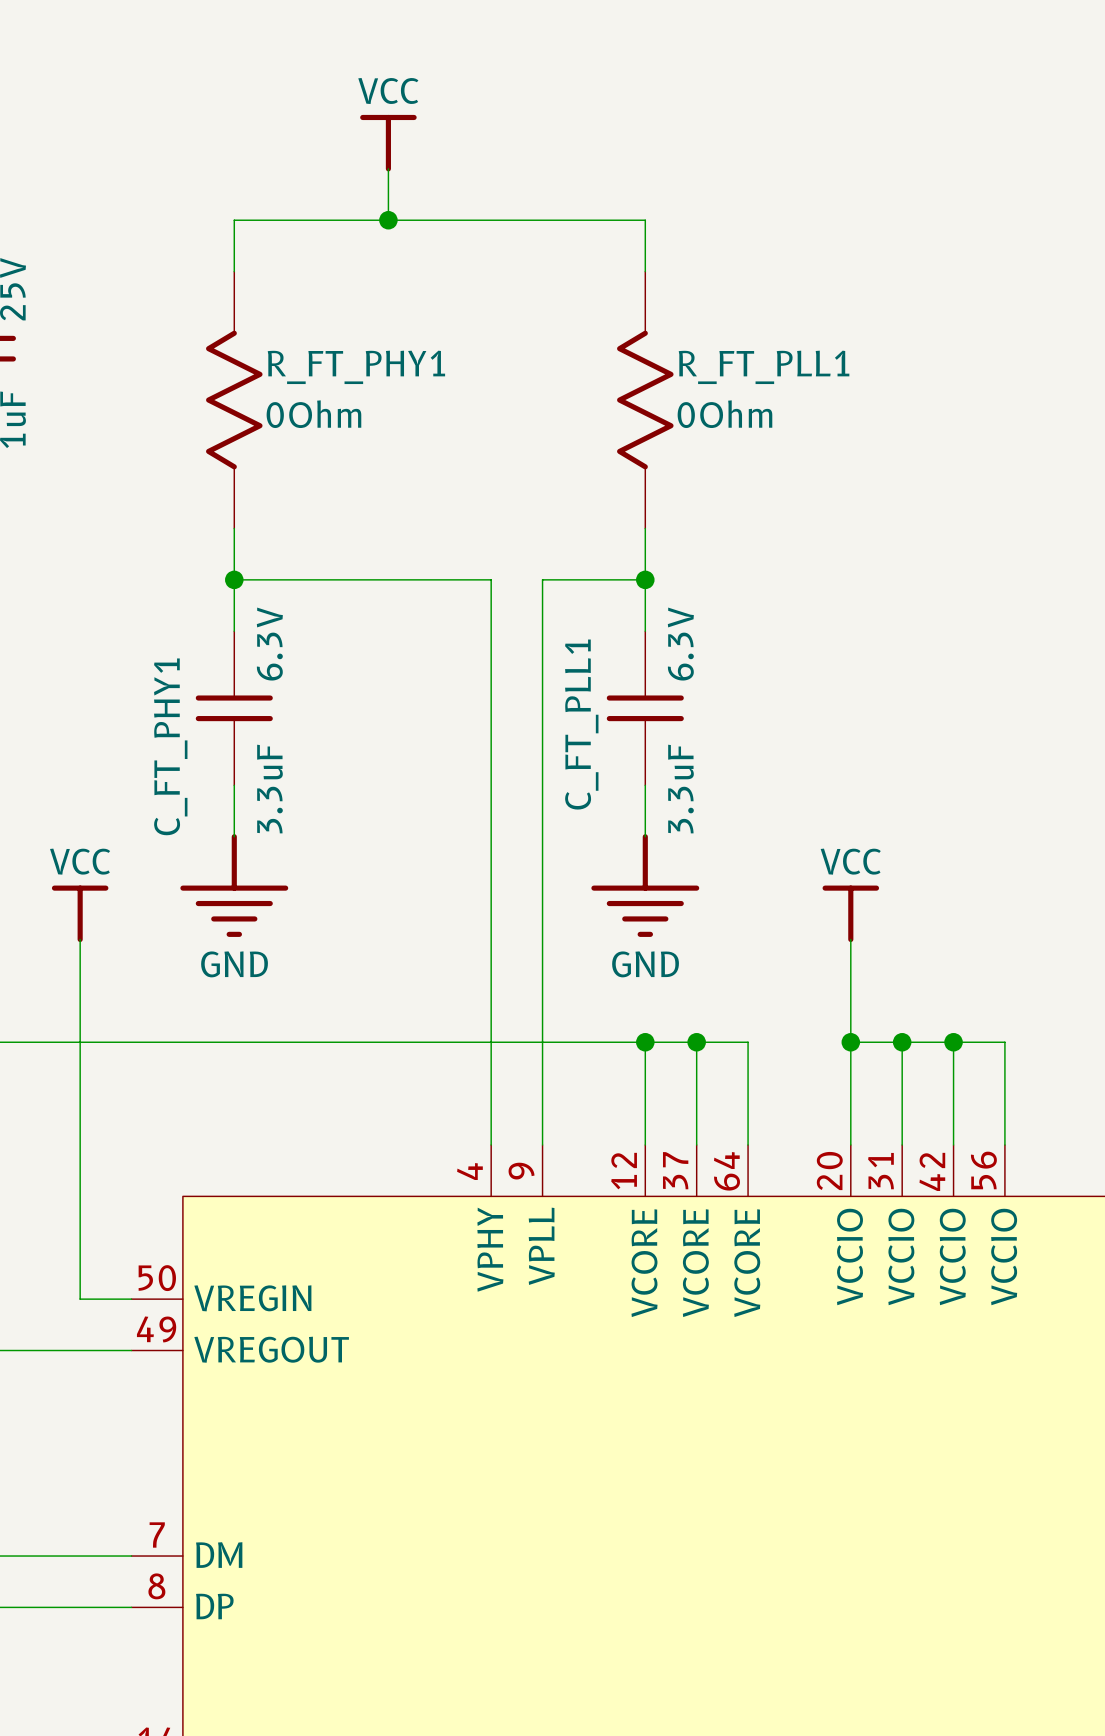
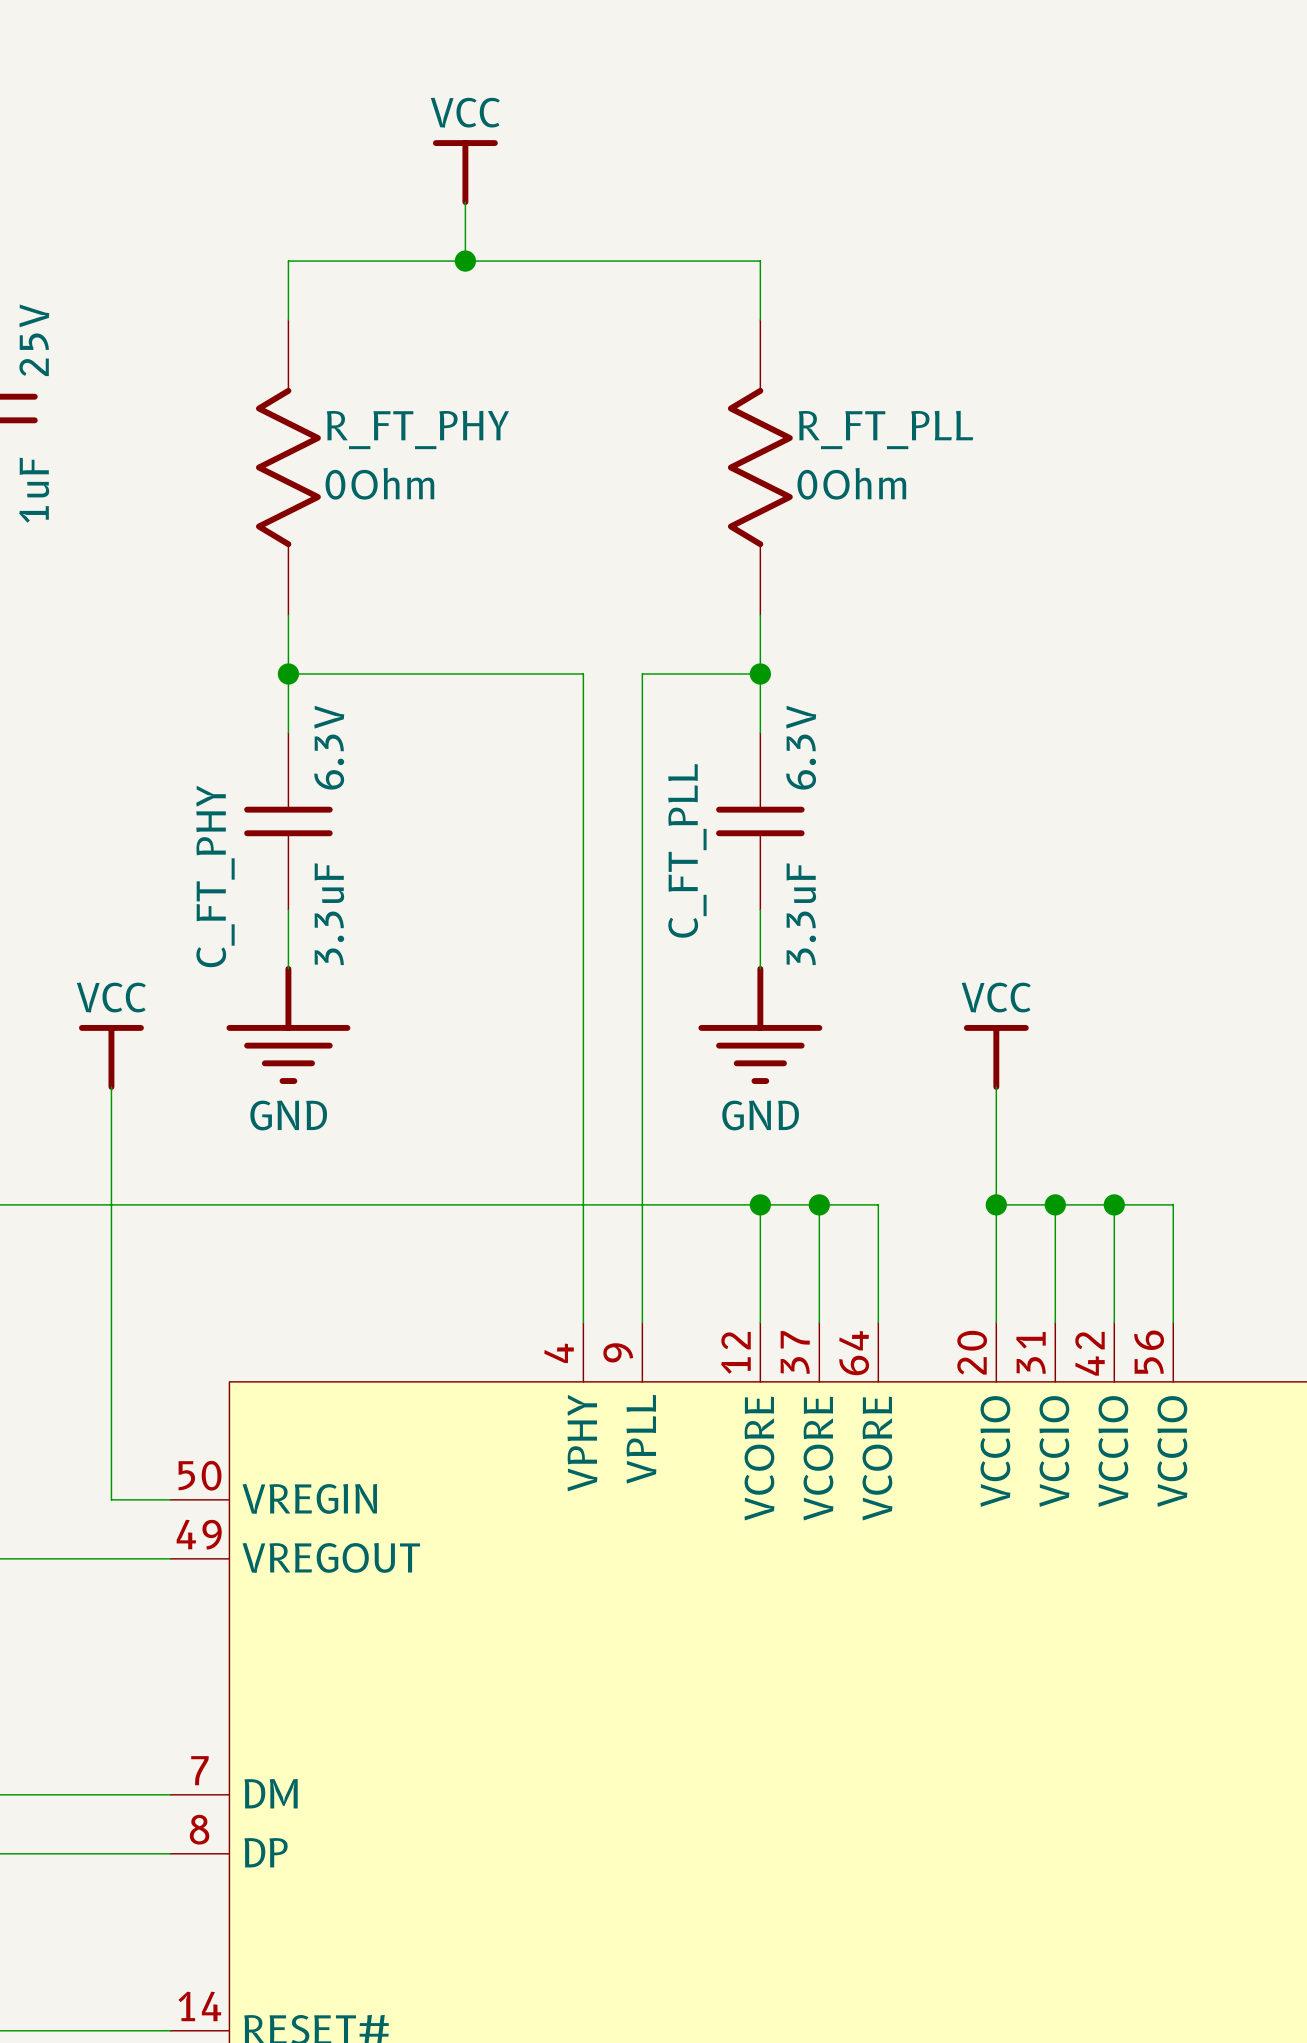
R_FT_PHY1 name: R_FT_PHY1 (356, 367) -> R_FT_PHY (417, 429)
R_FT_PLL1 name: R_FT_PLL1 (764, 367) -> R_FT_PLL (885, 429)
C_FT_PLL1 name: C_FT_PLL1 (581, 724) -> C_FT_PLL (687, 850)
C_FT_PHY1 name: C_FT_PHY1 (170, 746) -> C_FT_PHY (215, 876)

